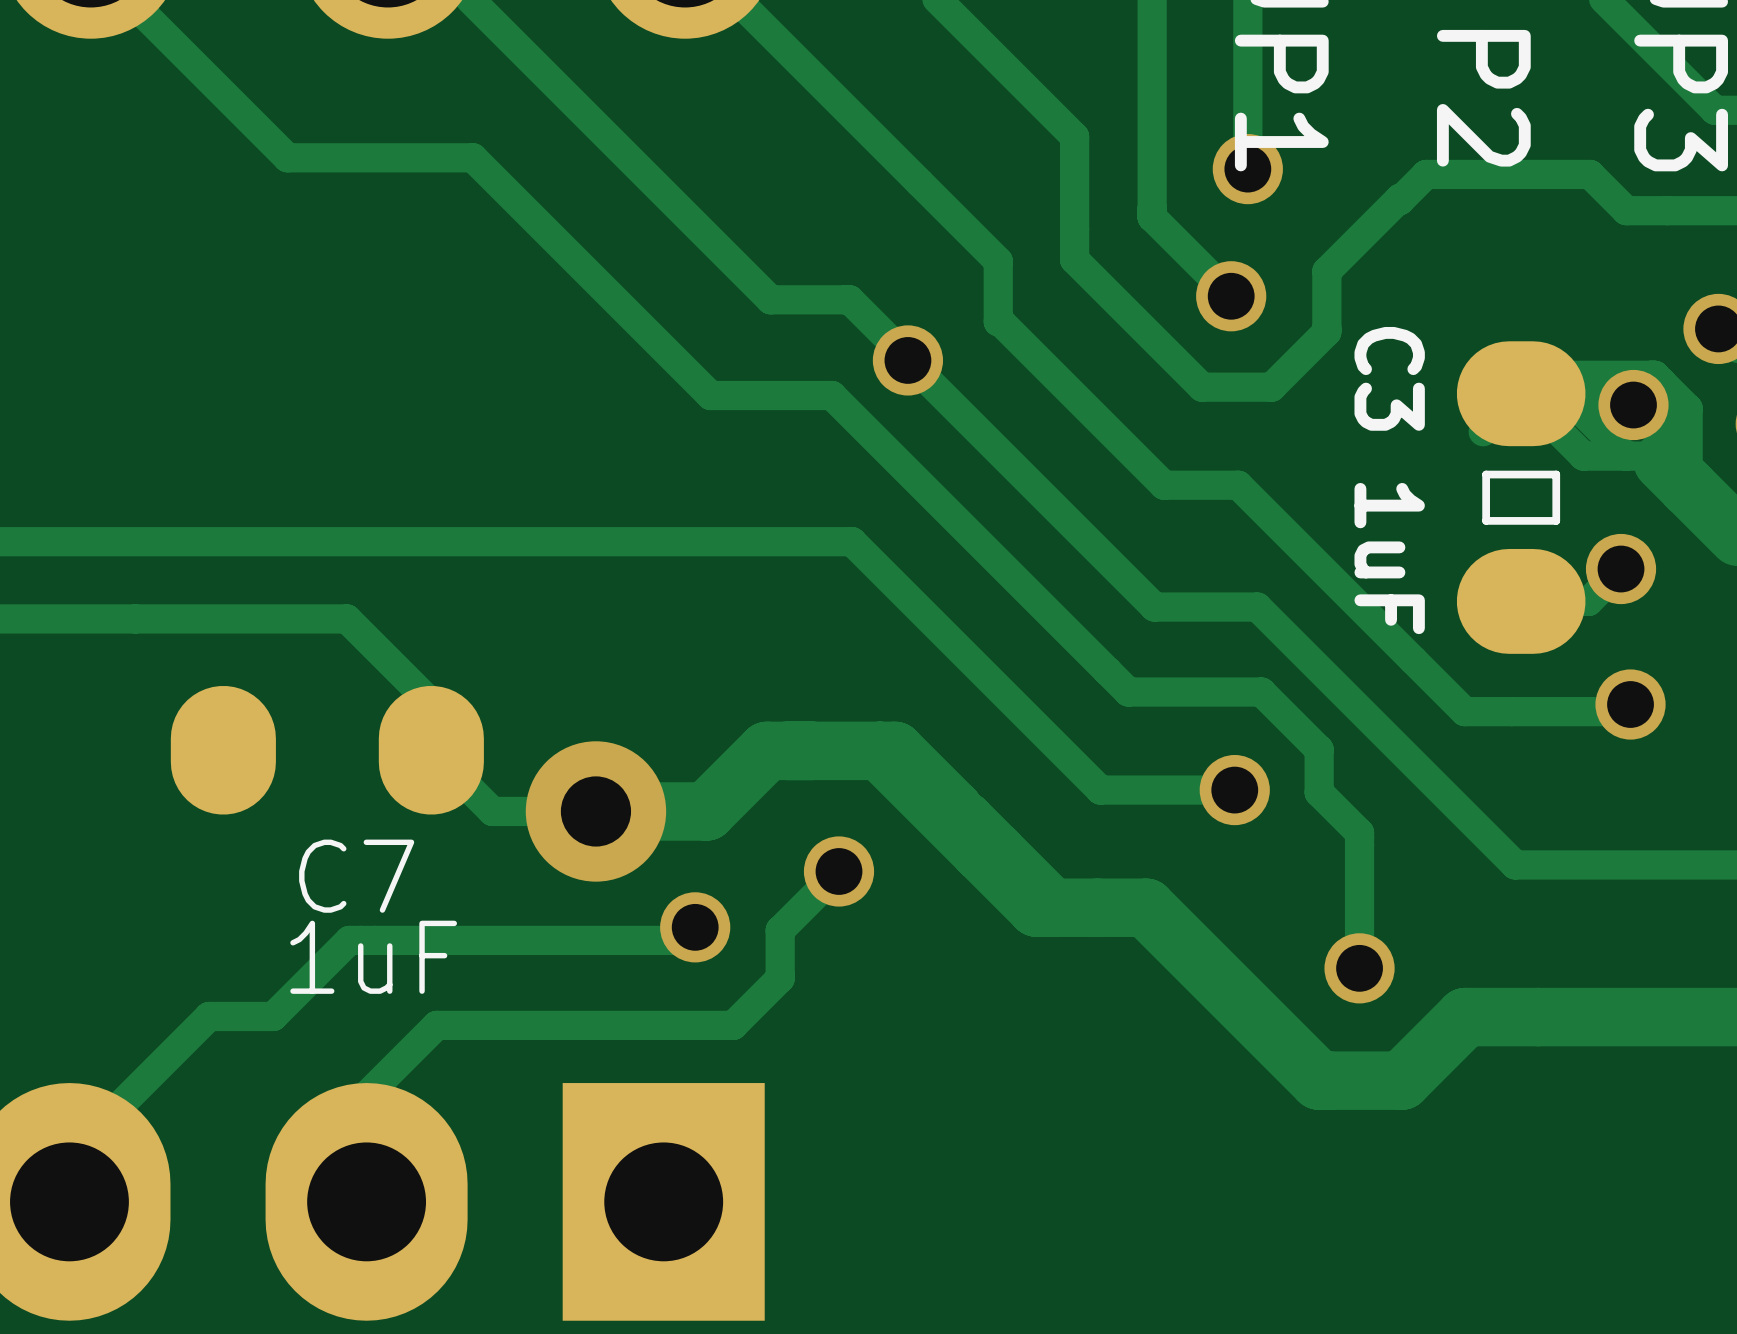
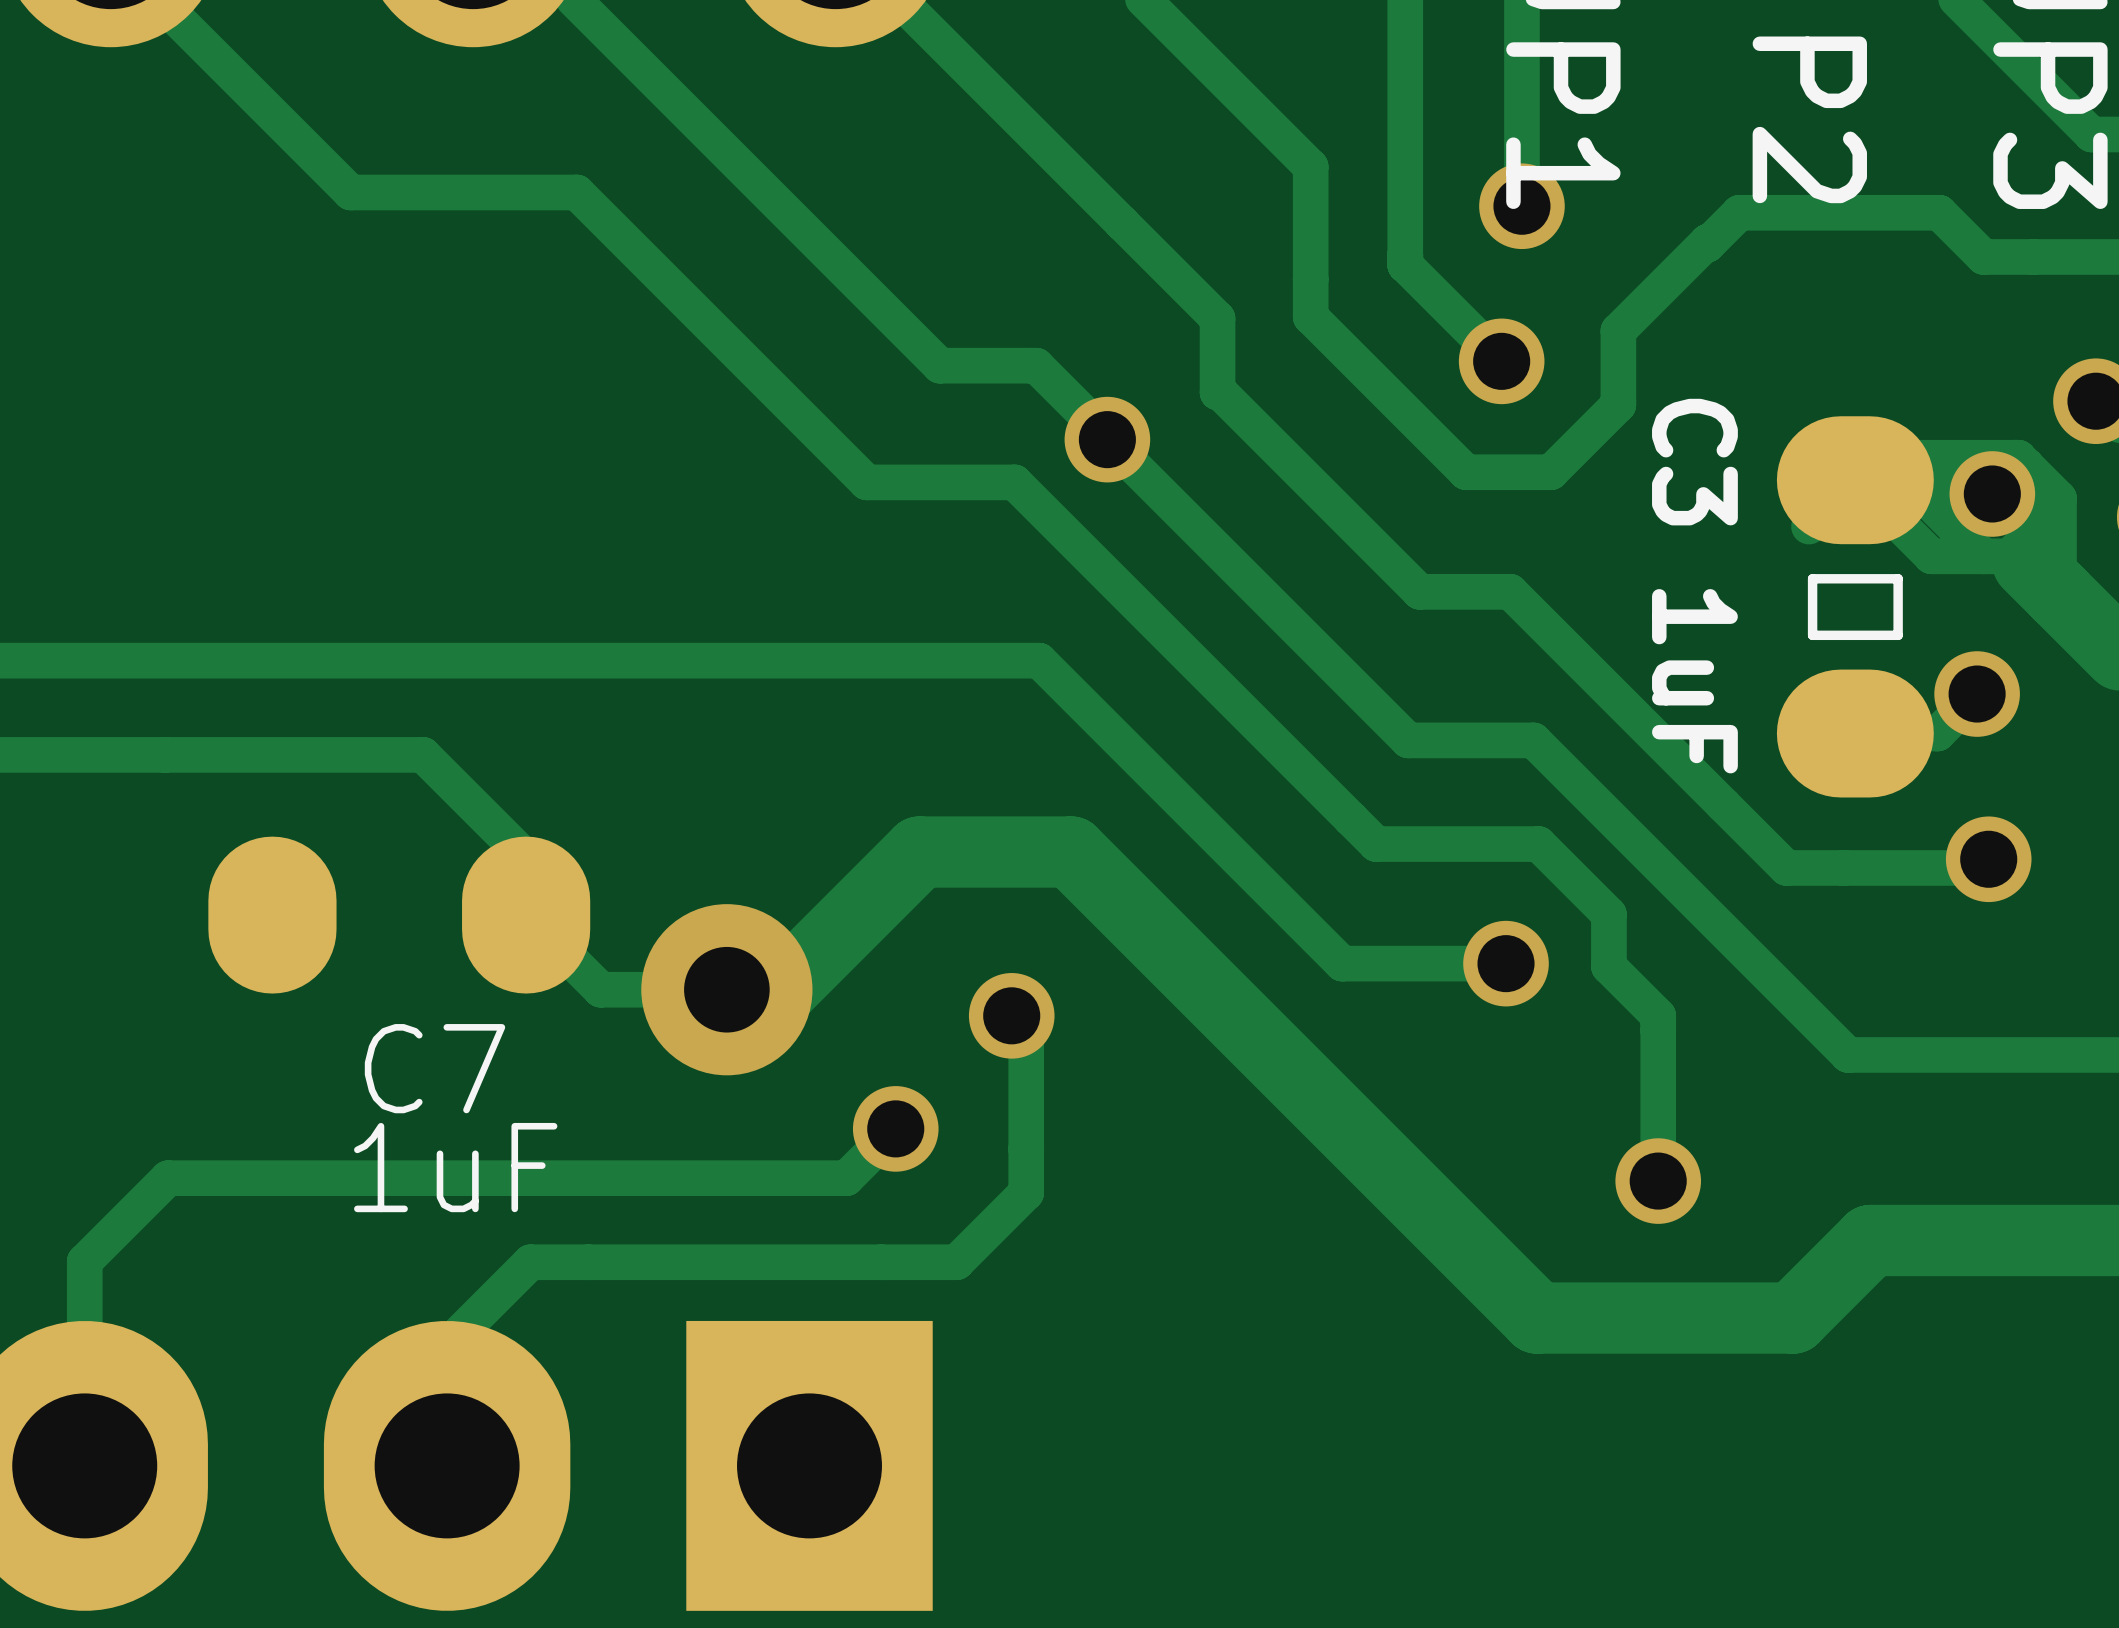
track: (880, 750) (1036, 907) (1146, 907) (1319, 1080) -> (781, 989) (919, 852) (1071, 852) (1537, 1318) (1608, 1318)
track: (641, 811) (706, 811) (767, 750) (894, 750) (953, 809) (953, 820) (964, 820) (1051, 907) -> none
track: (839, 871) (780, 930) (780, 978) (733, 1025) (436, 1025) (366, 1095) (366, 1103) -> (1011, 1015) (1026, 1030) (1026, 1192) (956, 1262) (530, 1262) (447, 1345)
via position: (839, 871) -> (1011, 1015)
track: (695, 927) (682, 940) (349, 940) (273, 1016) (209, 1016) (69, 1156) -> (895, 1128) (846, 1178) (168, 1178) (84, 1261) (84, 1410)
via position: (695, 927) -> (895, 1128)
track: (1533, 1017) (1465, 1017) (1401, 1080) -> (1870, 1240) (1793, 1318) (1709, 1318)

